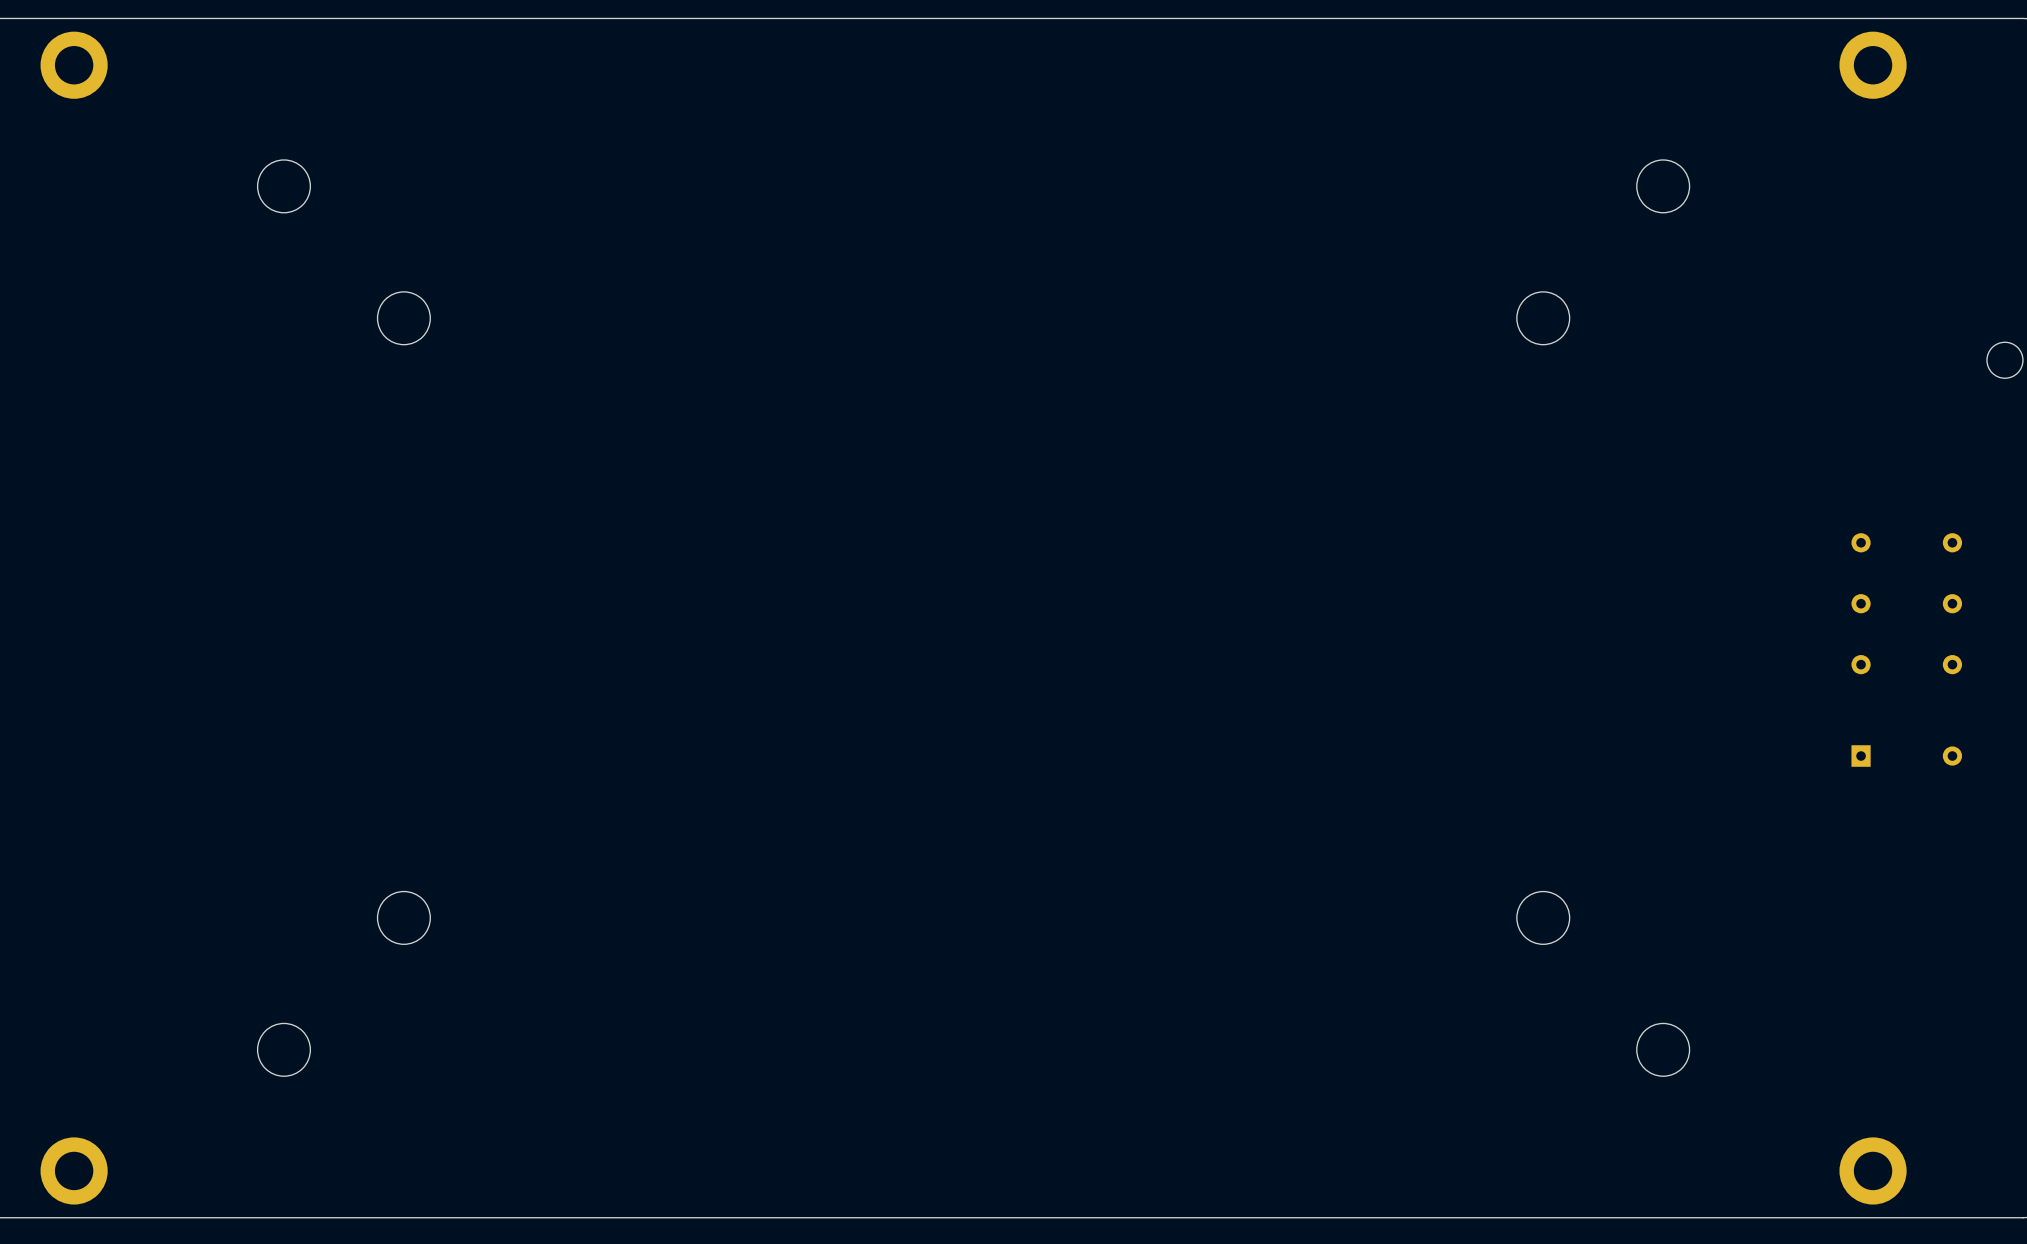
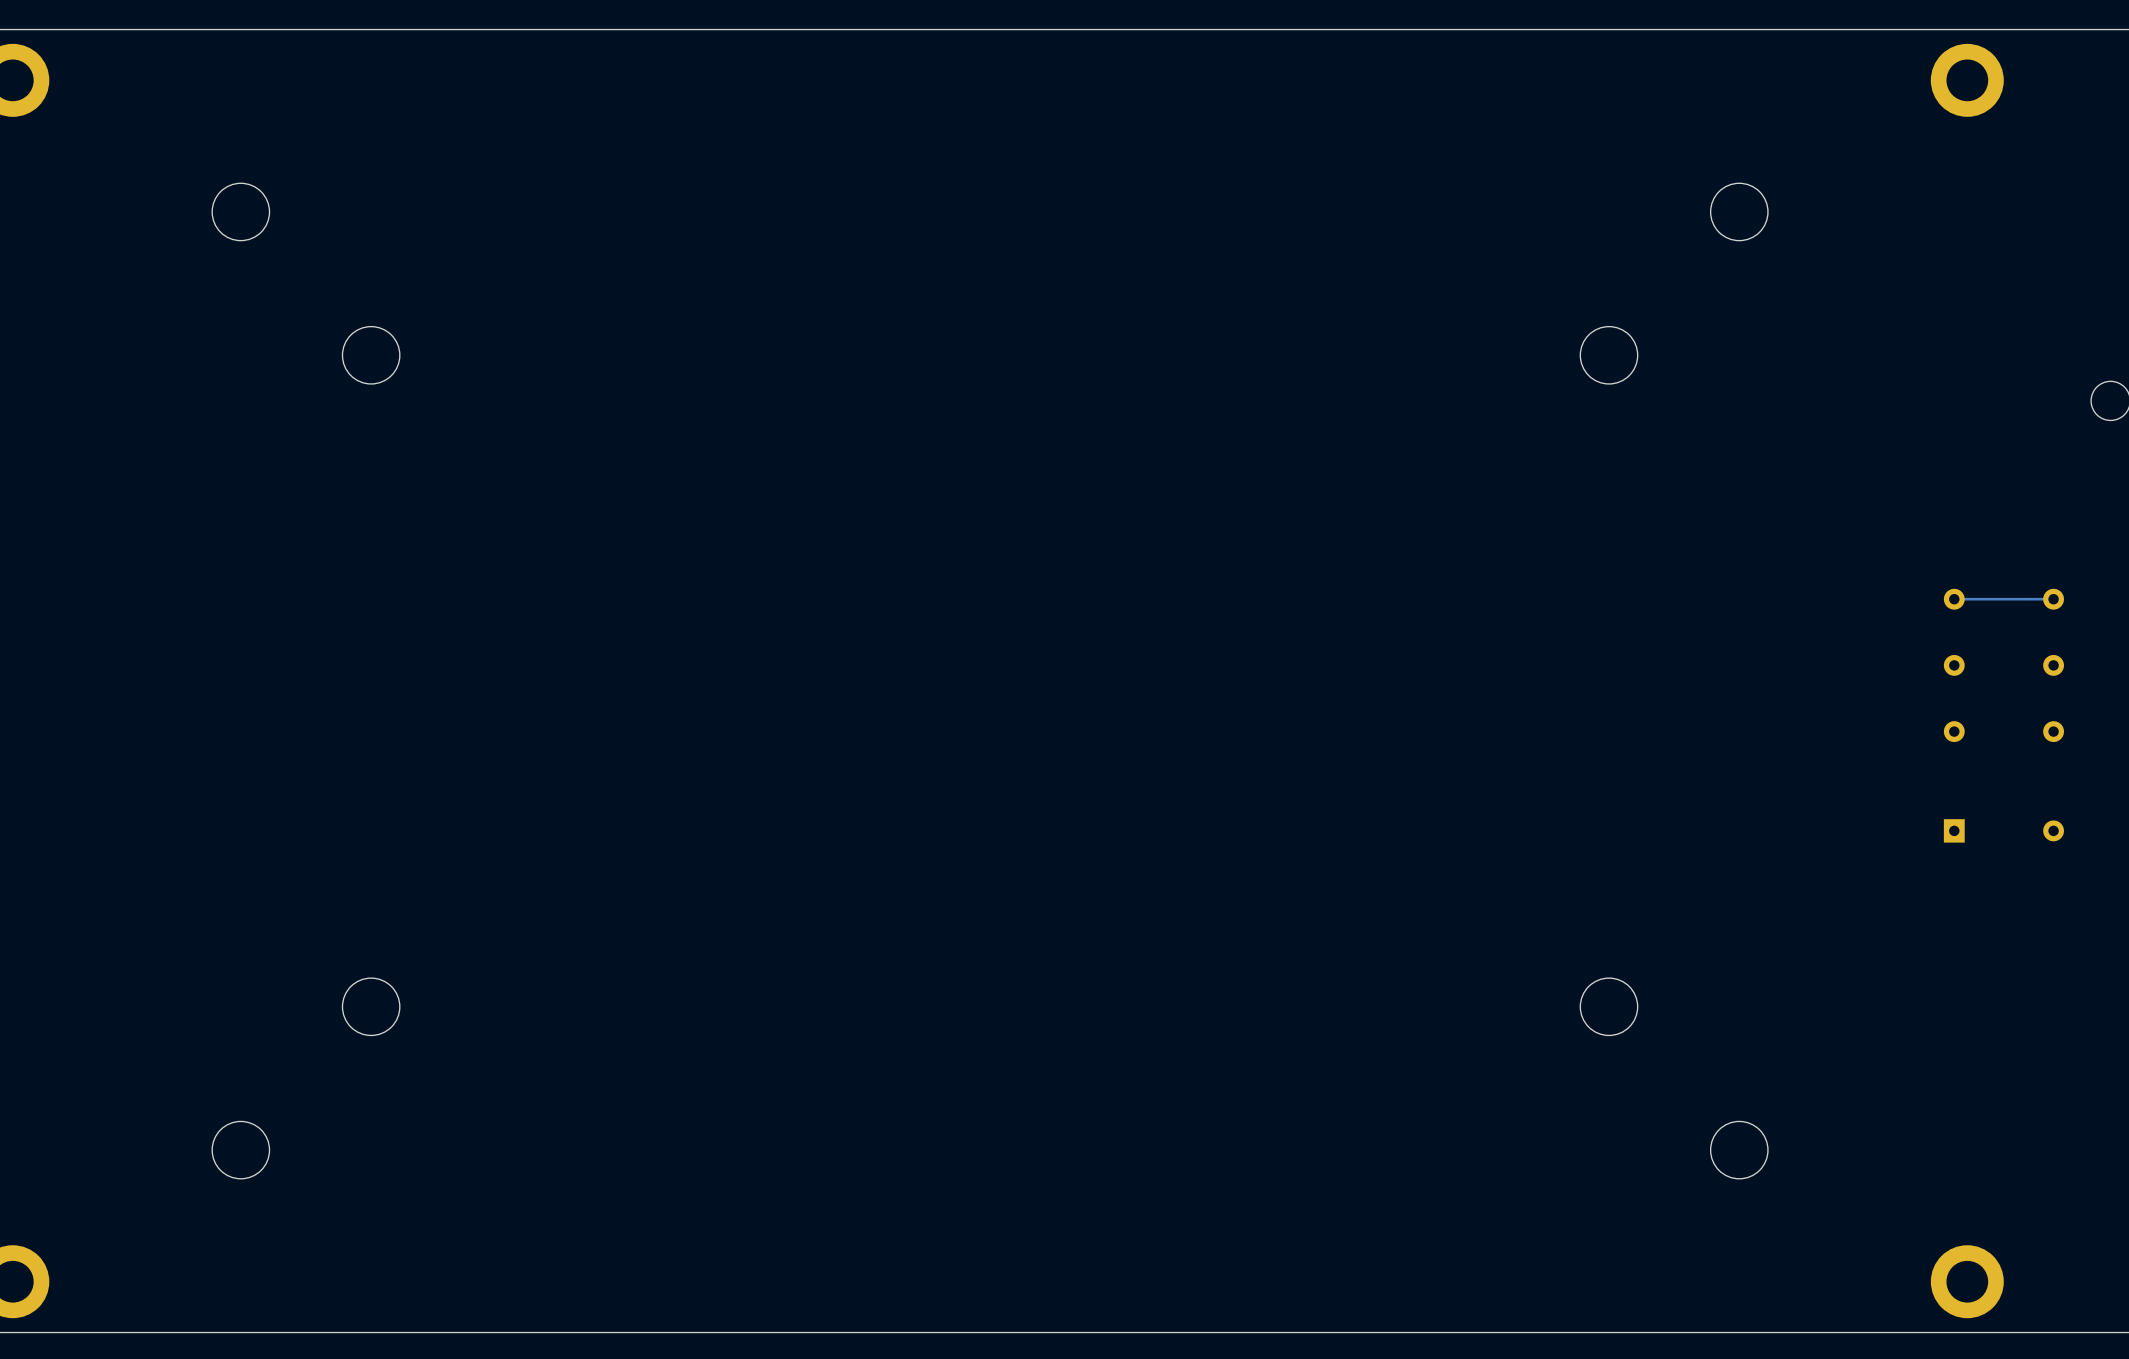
track: none -> (2053, 599) (1954, 599)

